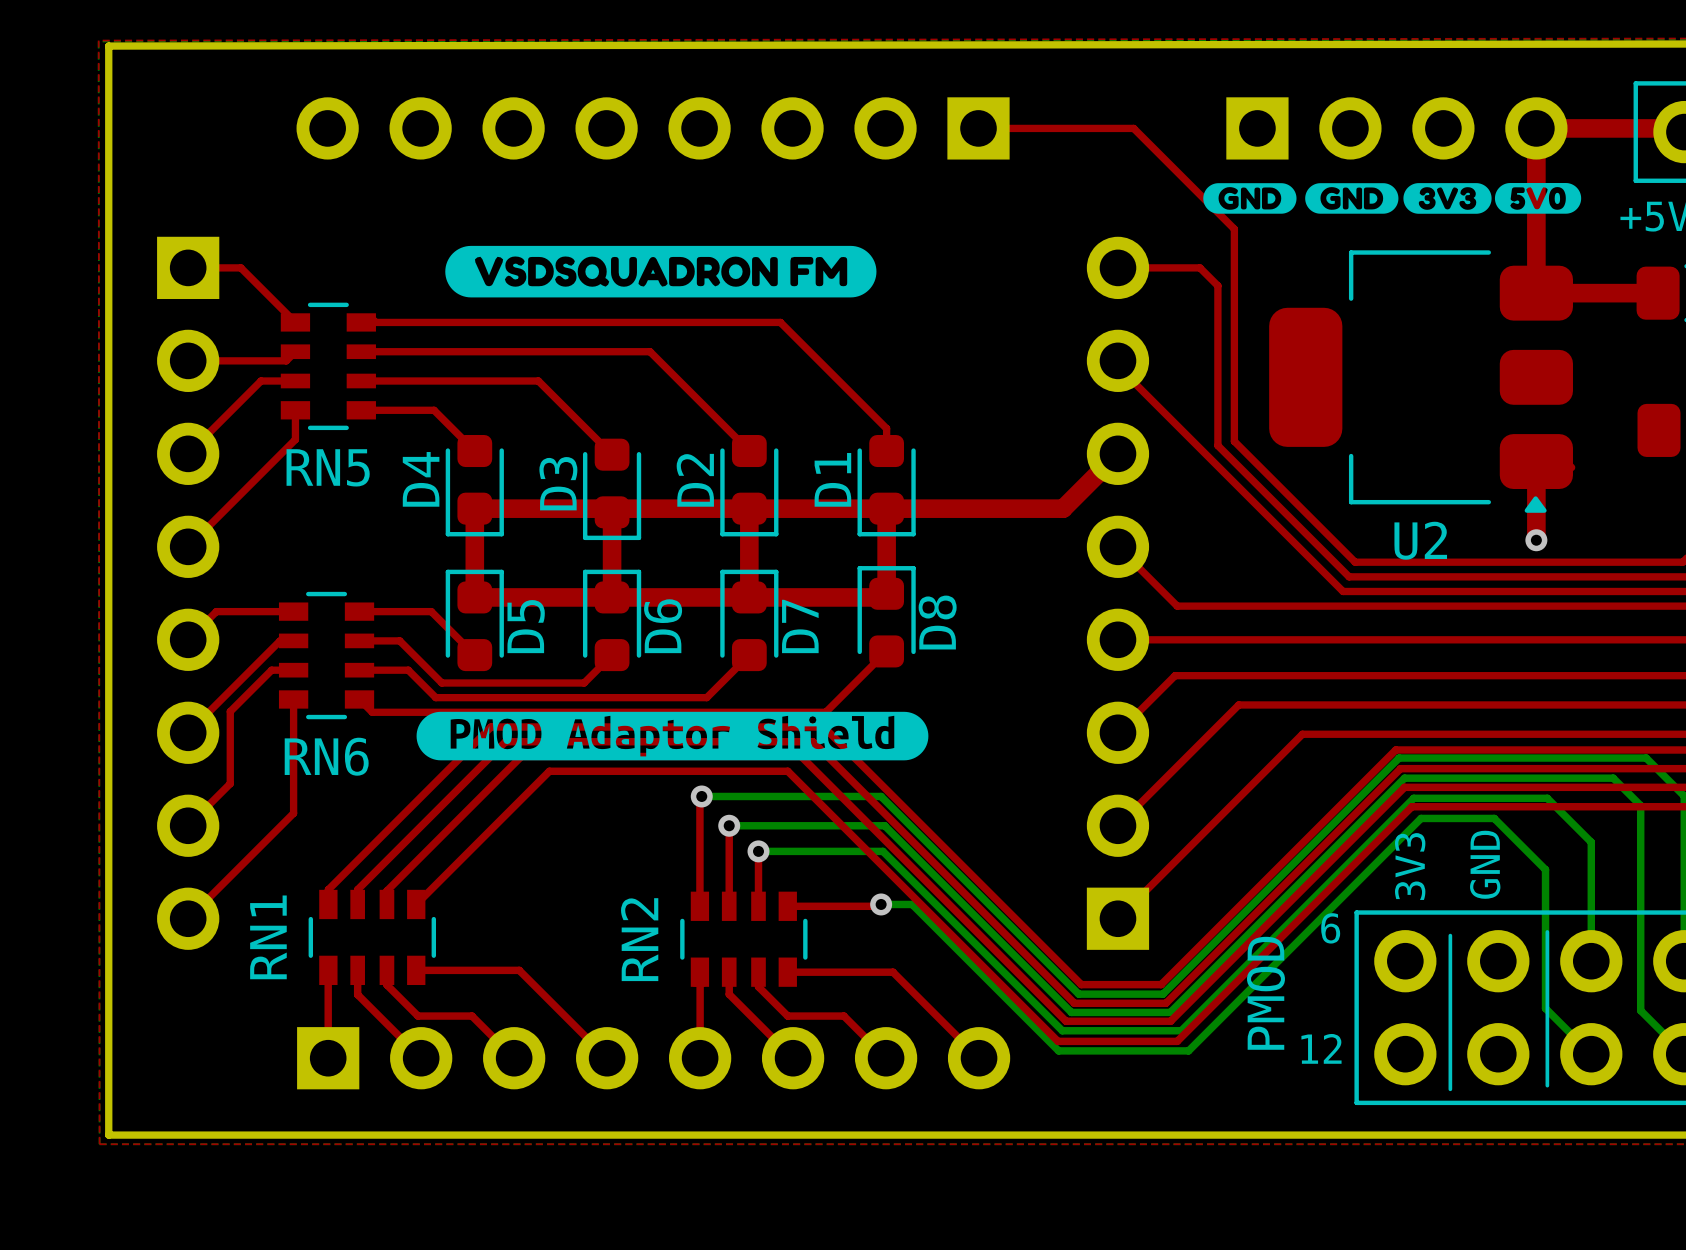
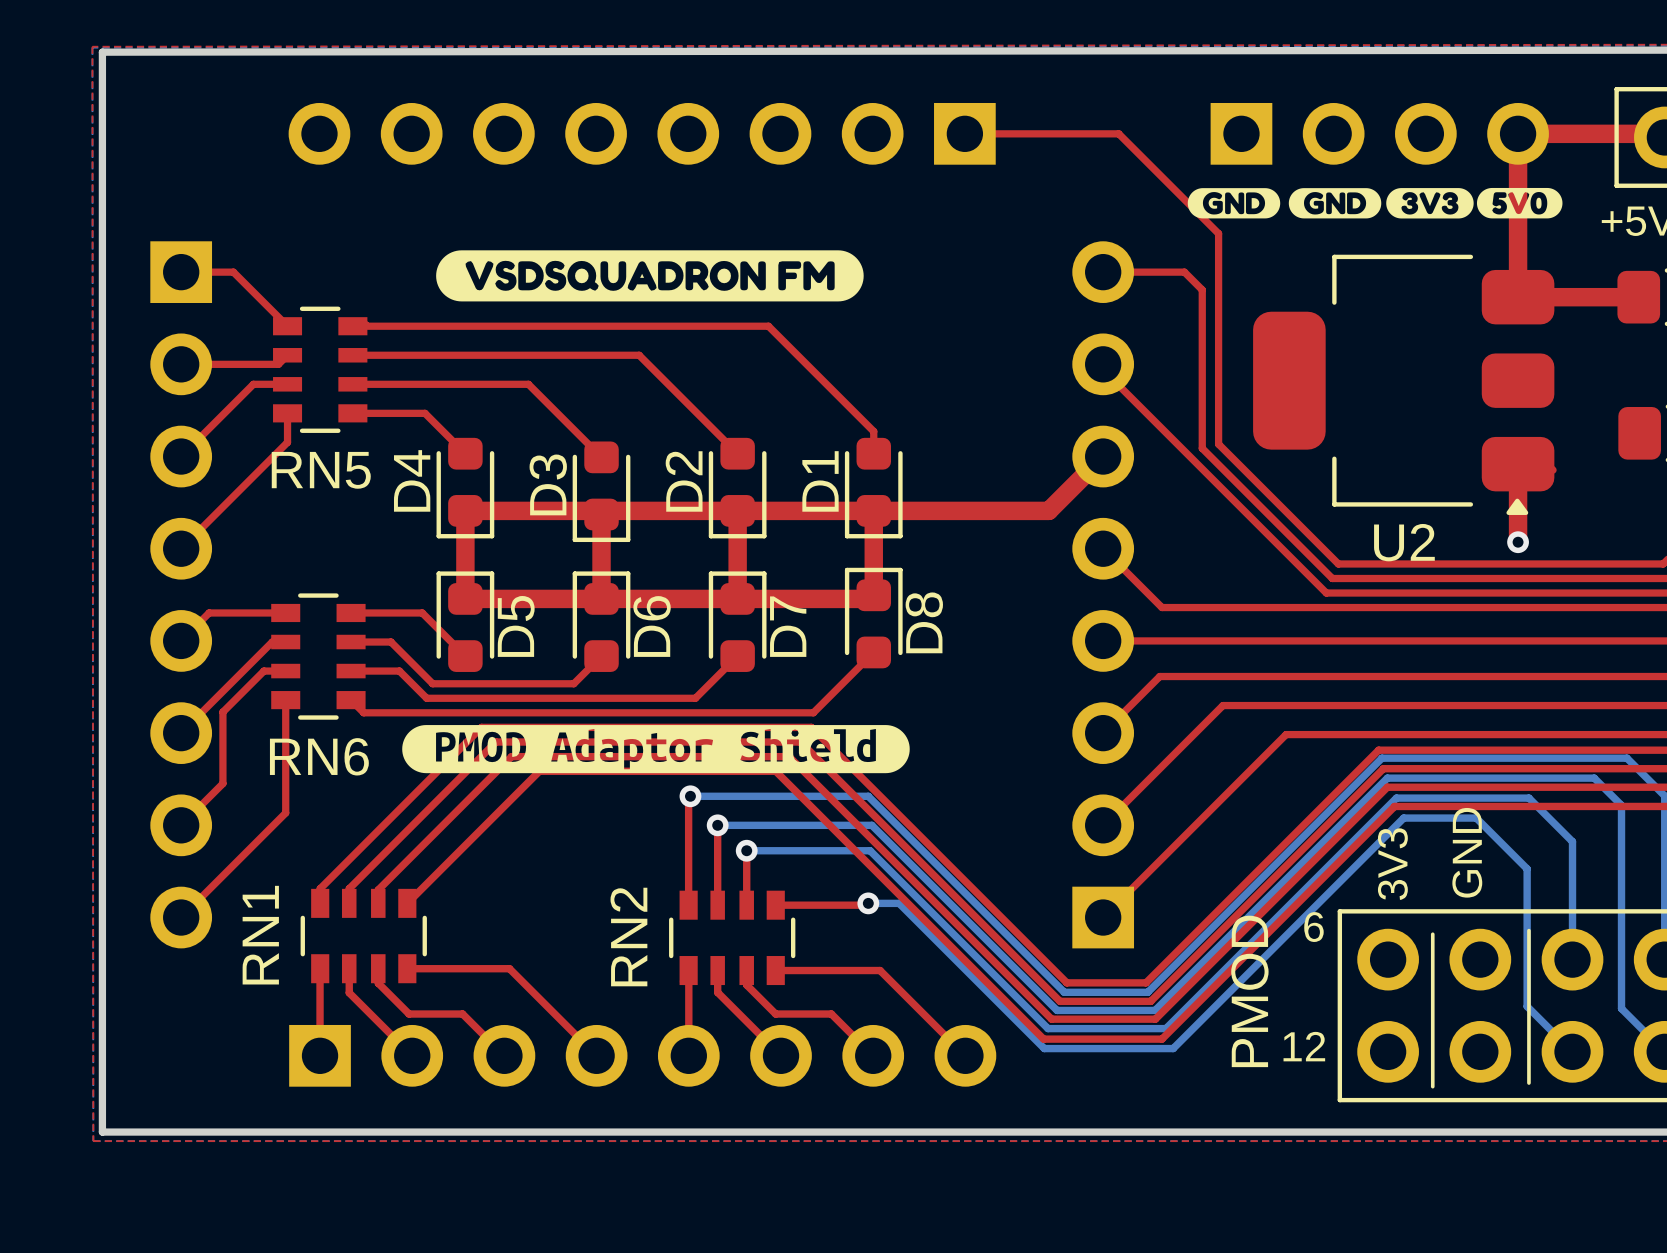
drawing position: (672, 736) -> (655, 749)

